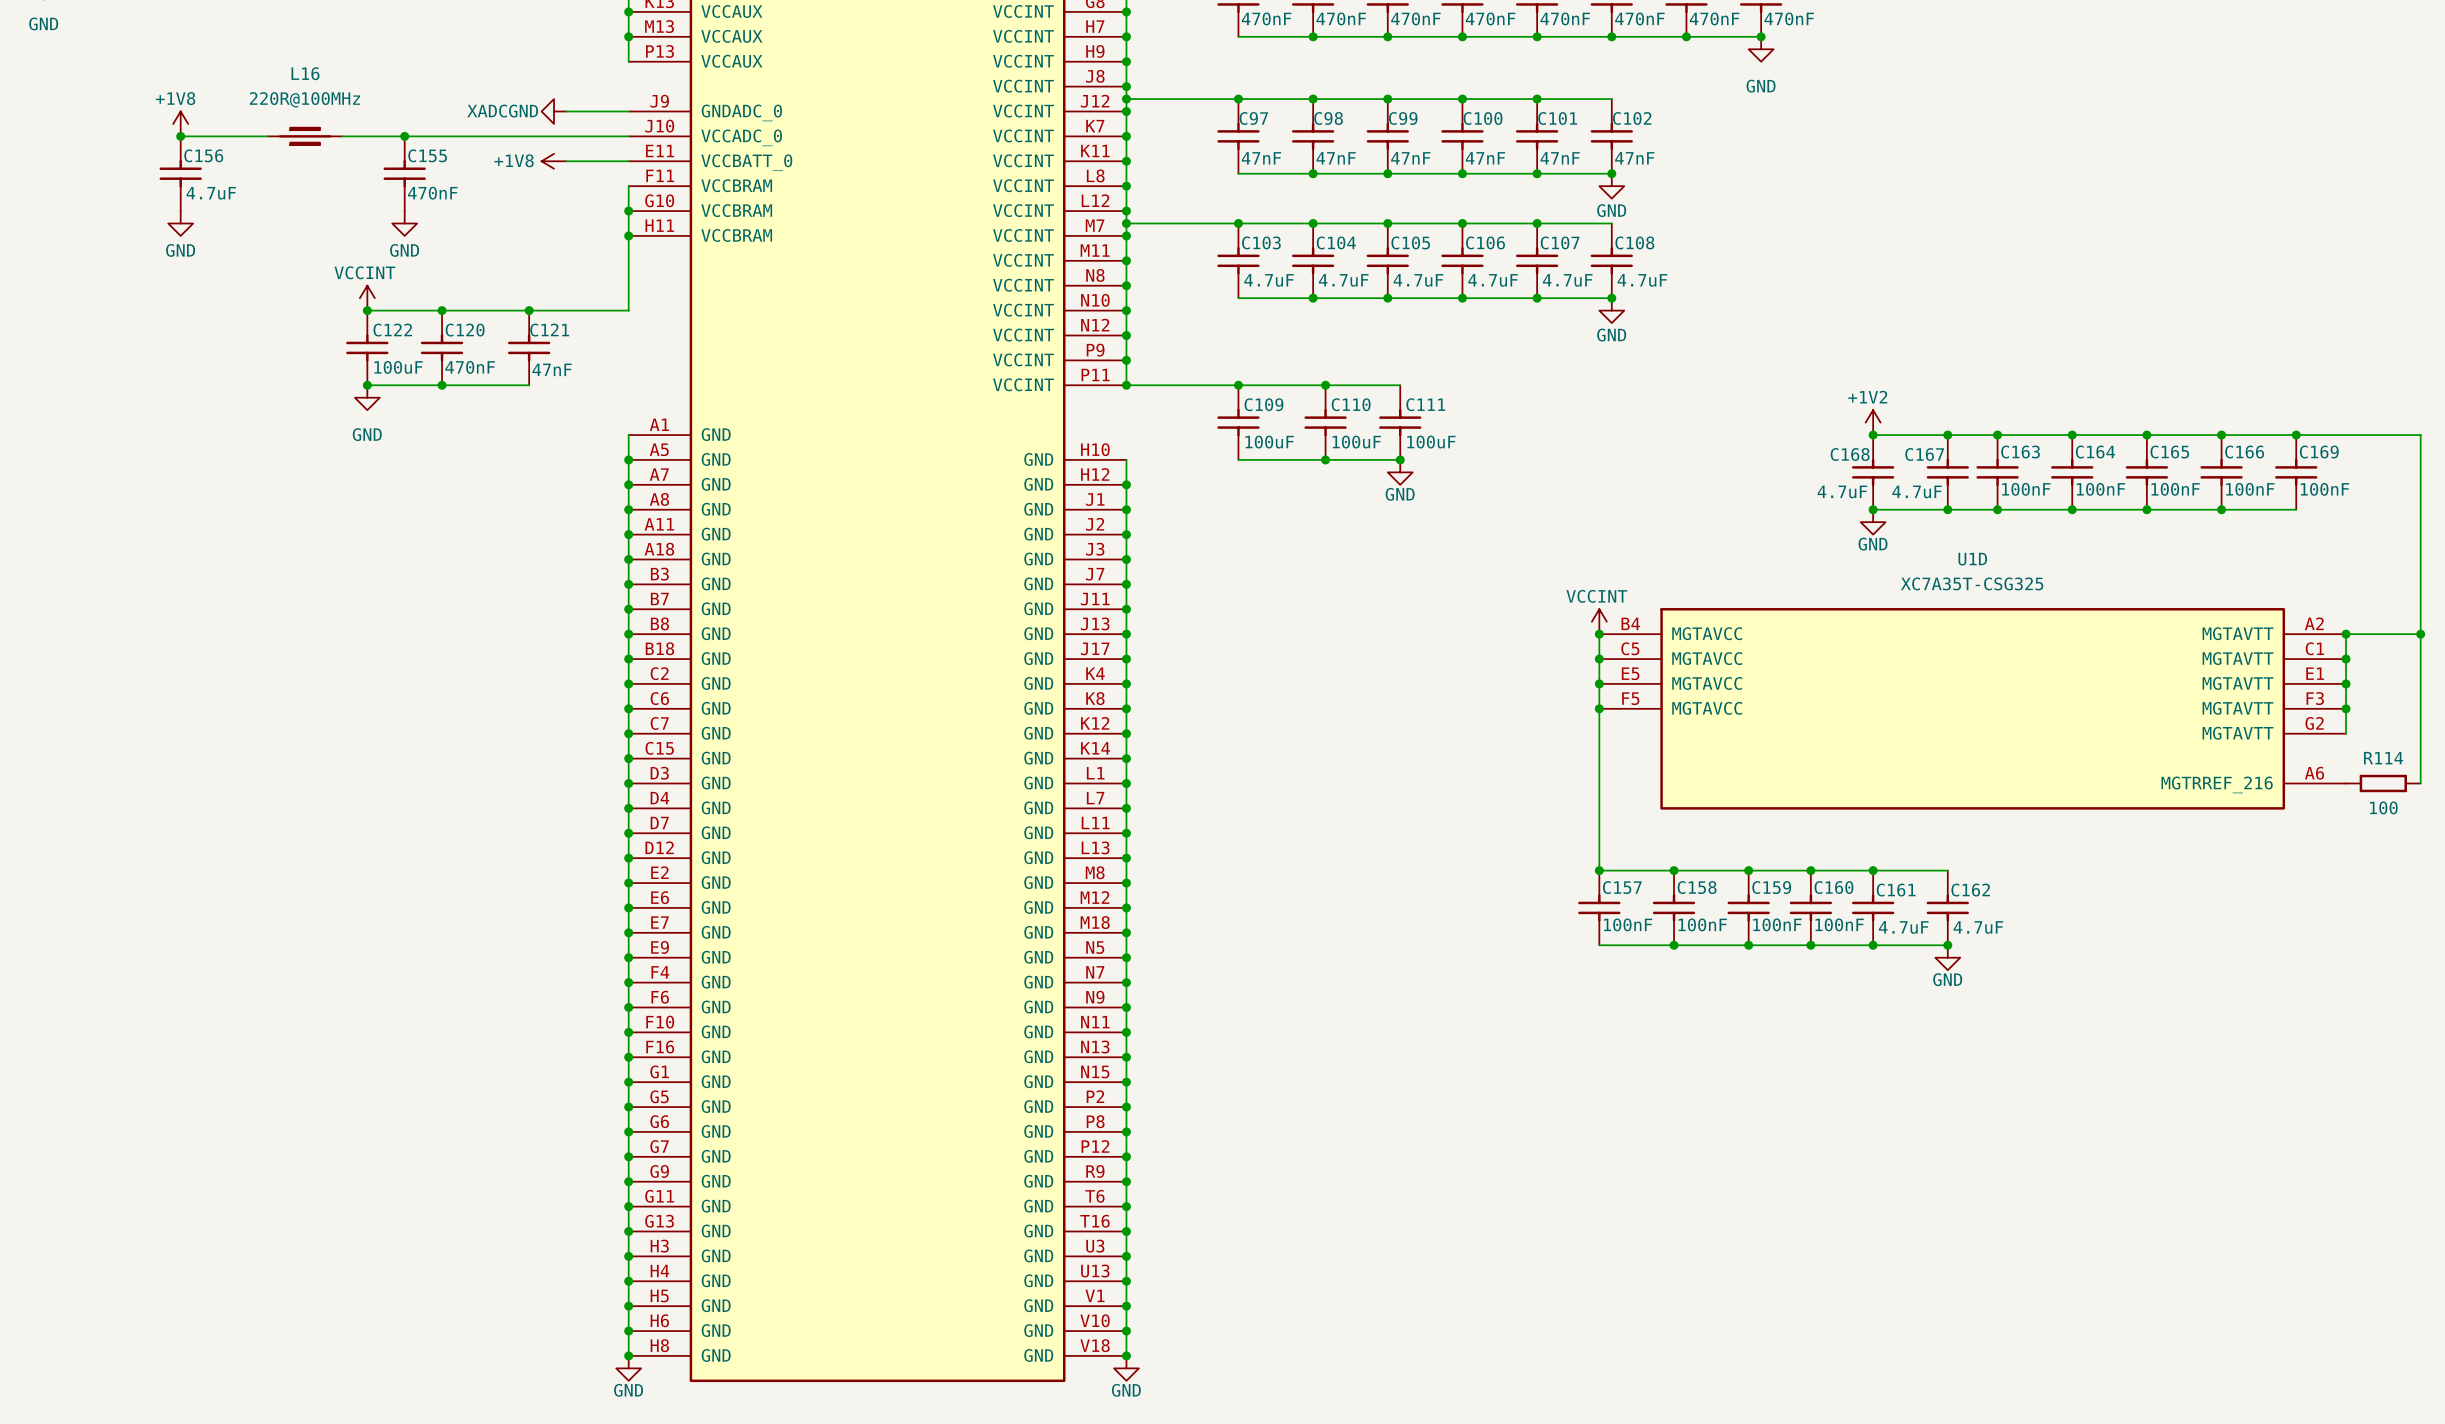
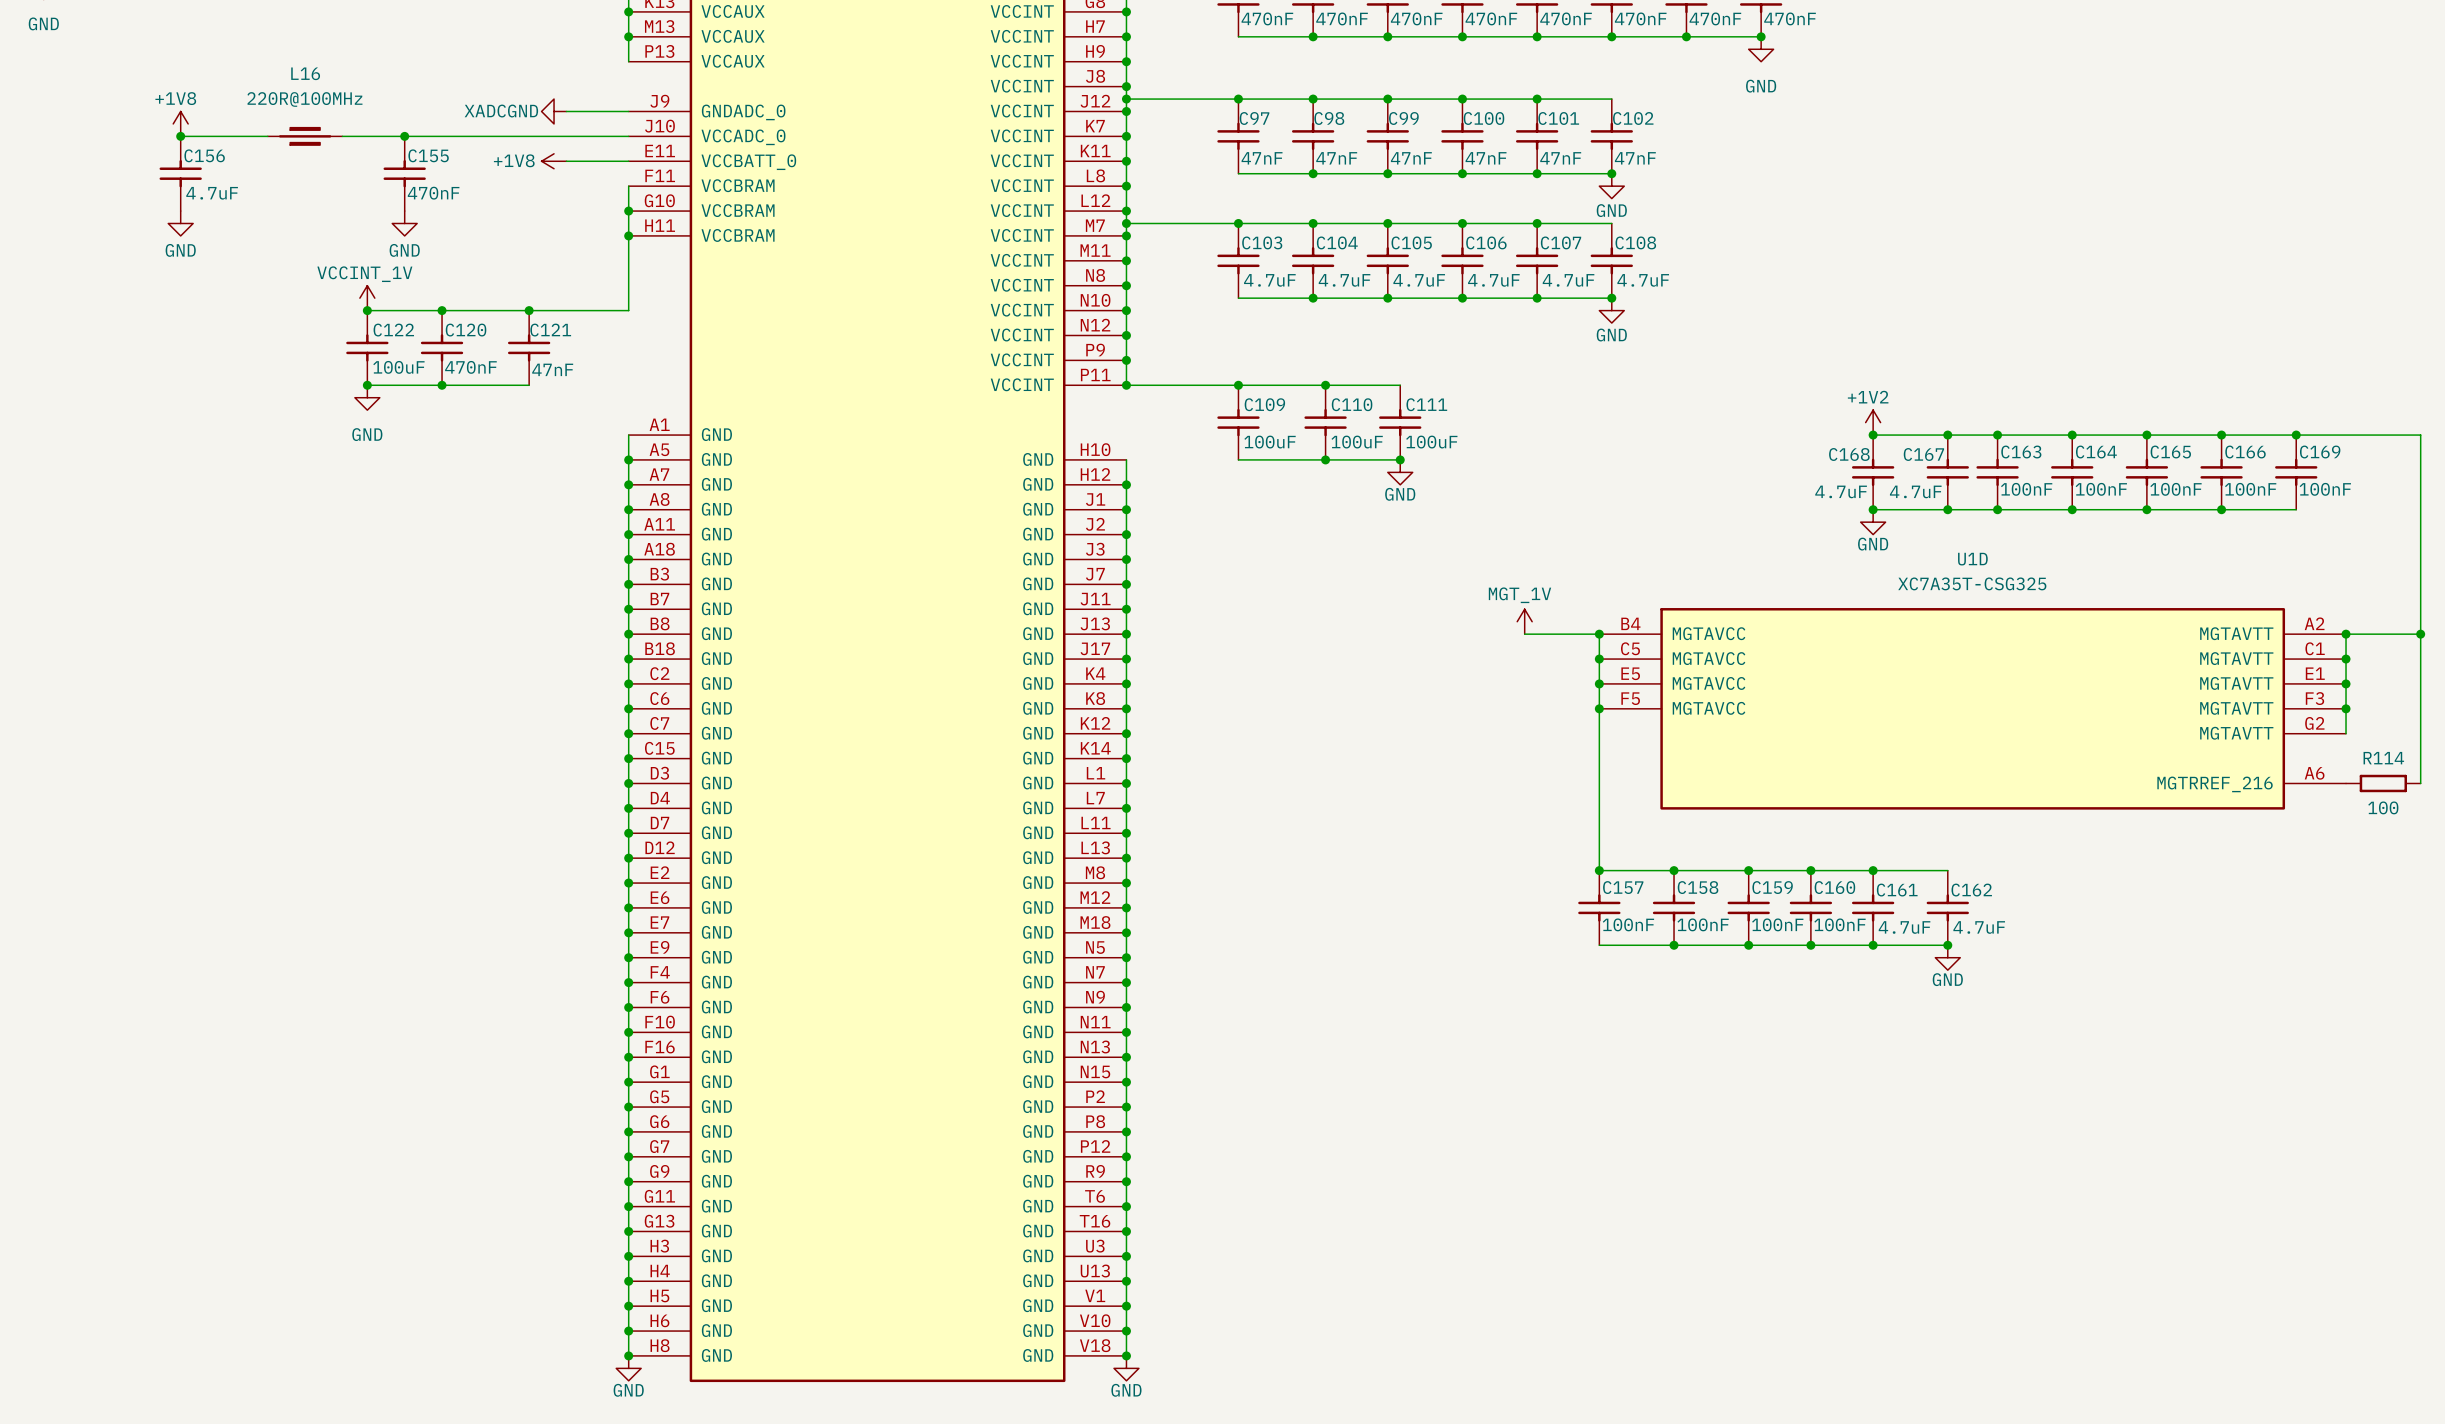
power symbol: VCCINT (367, 298) -> VCCINT_1V (367, 298)
power symbol: none -> MGT_1V (1524, 621)
power symbol: VCCINT (1599, 621) -> none
wire: none -> (1524, 634) (1599, 634)

